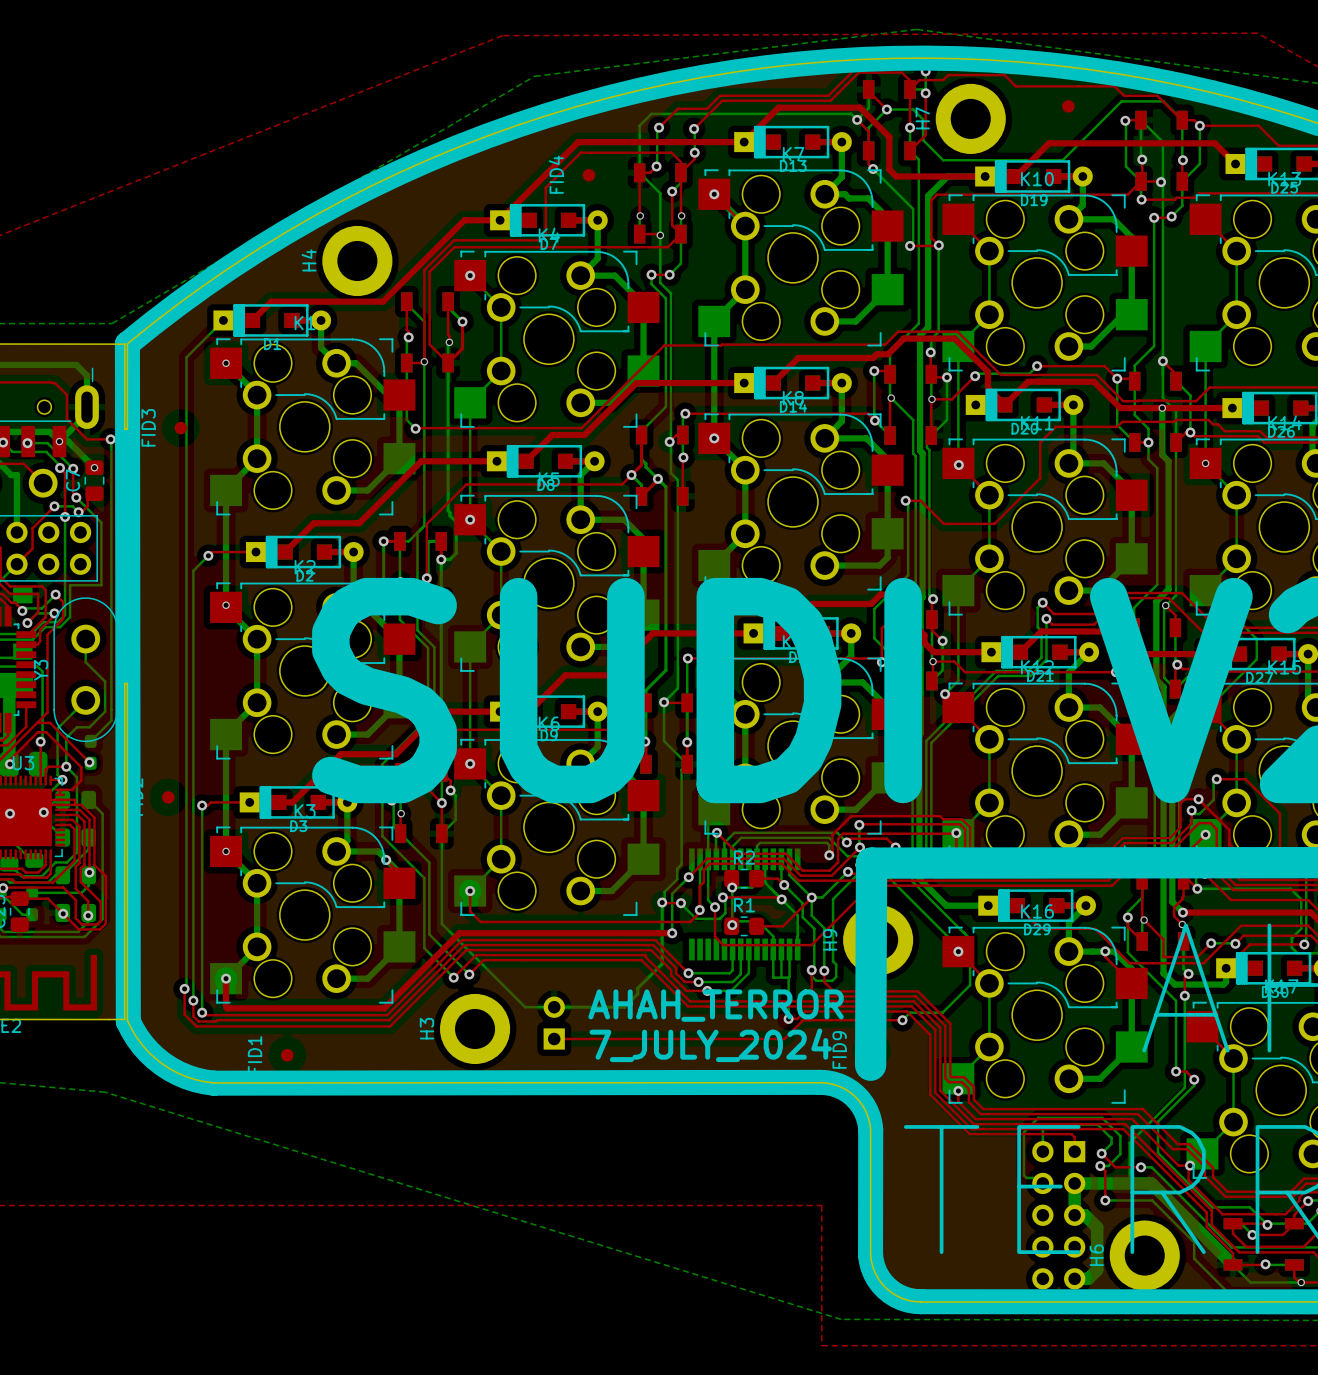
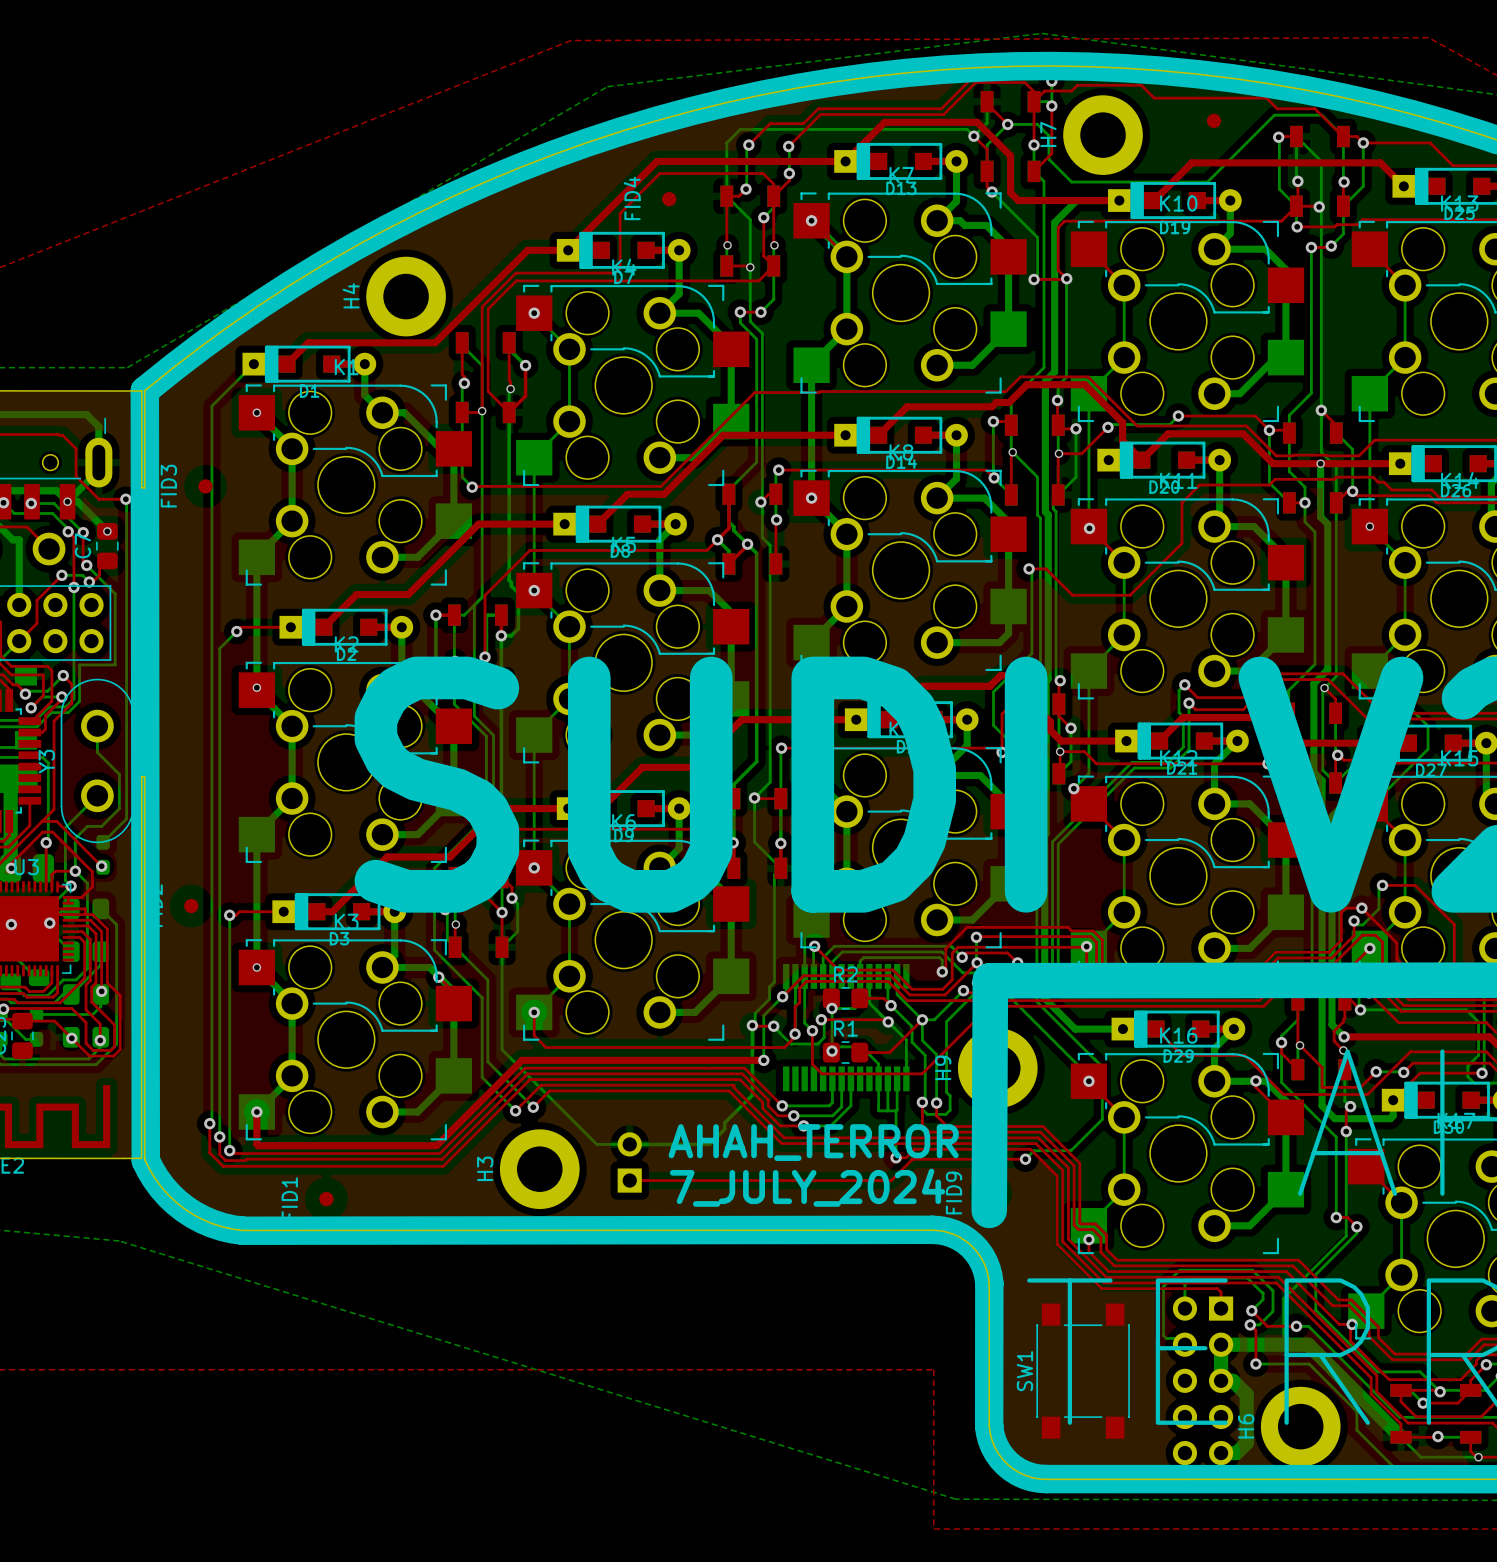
SW1: none -> (1083, 1371)

